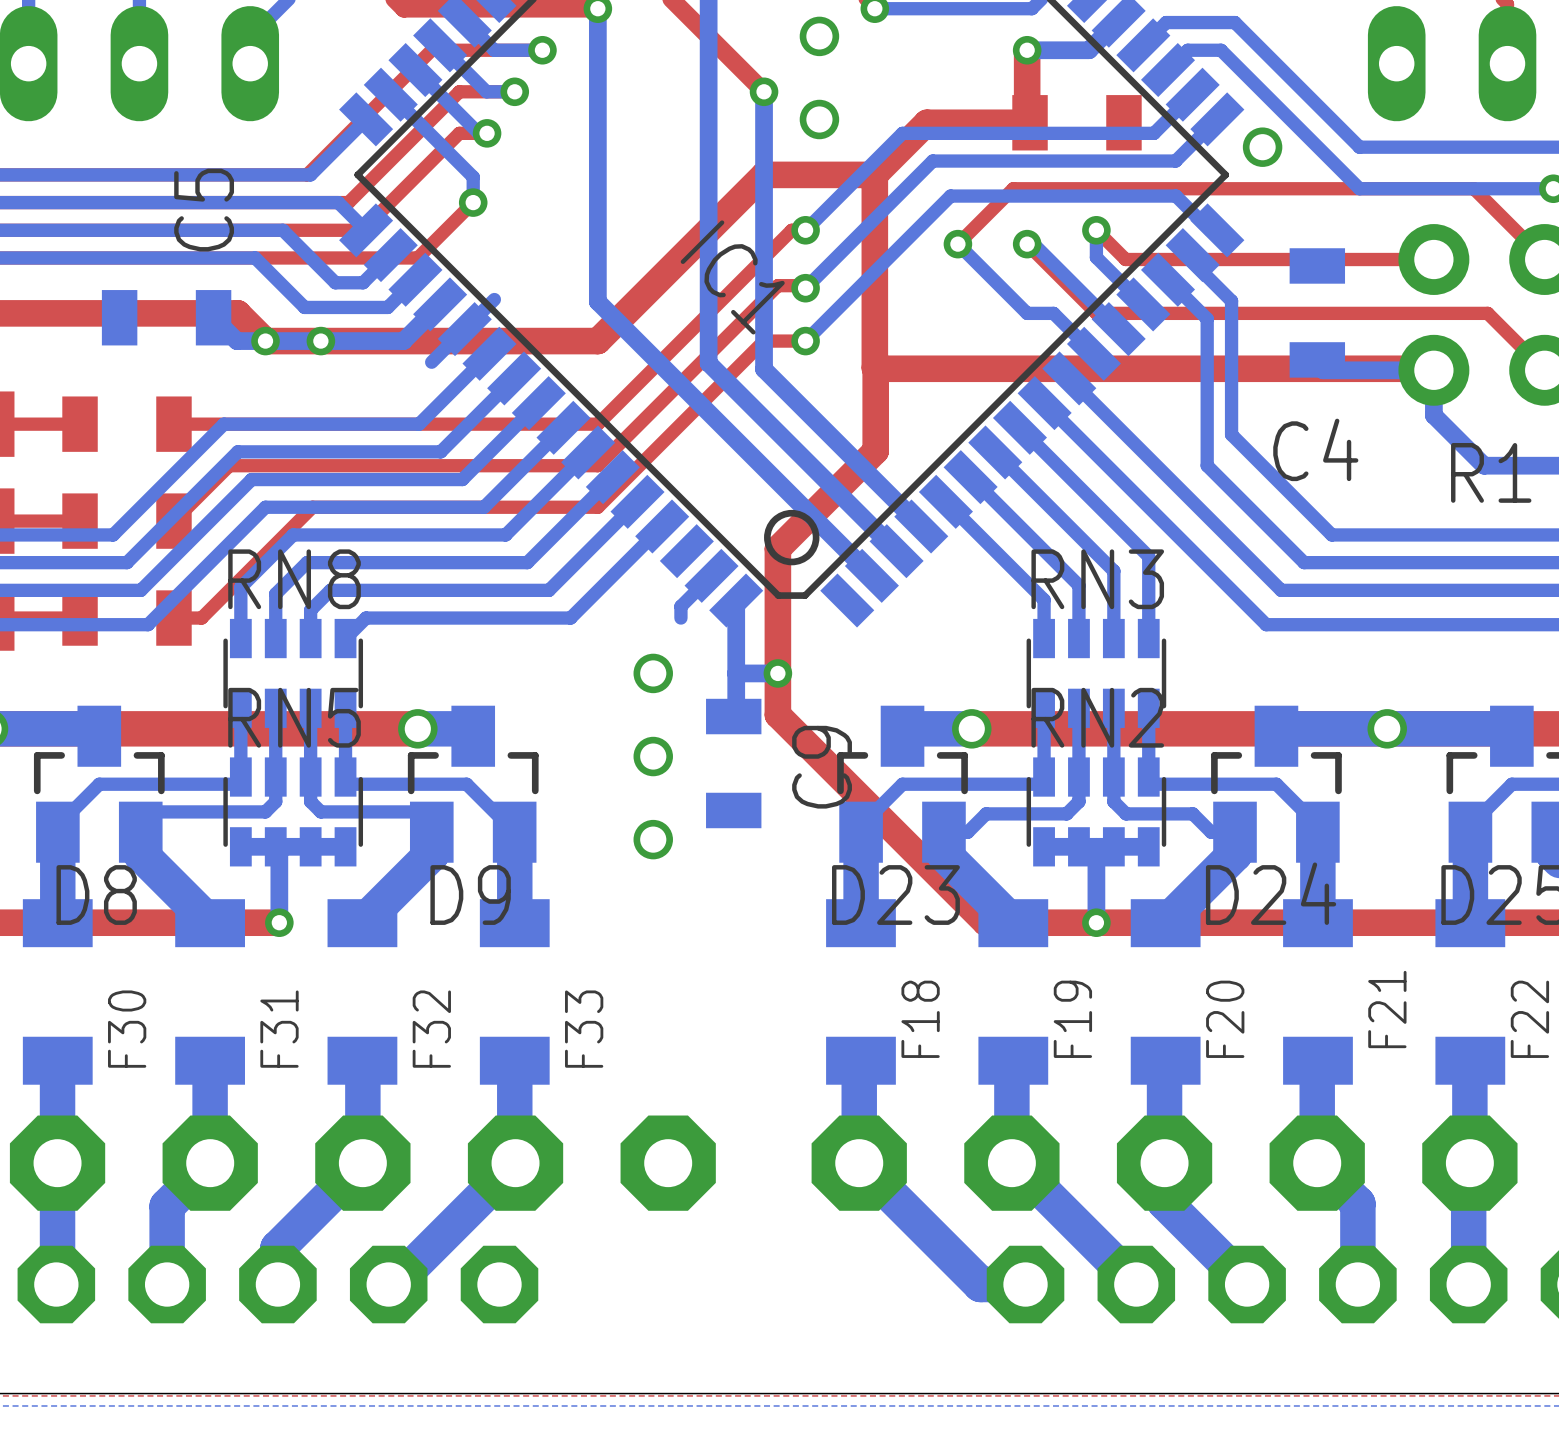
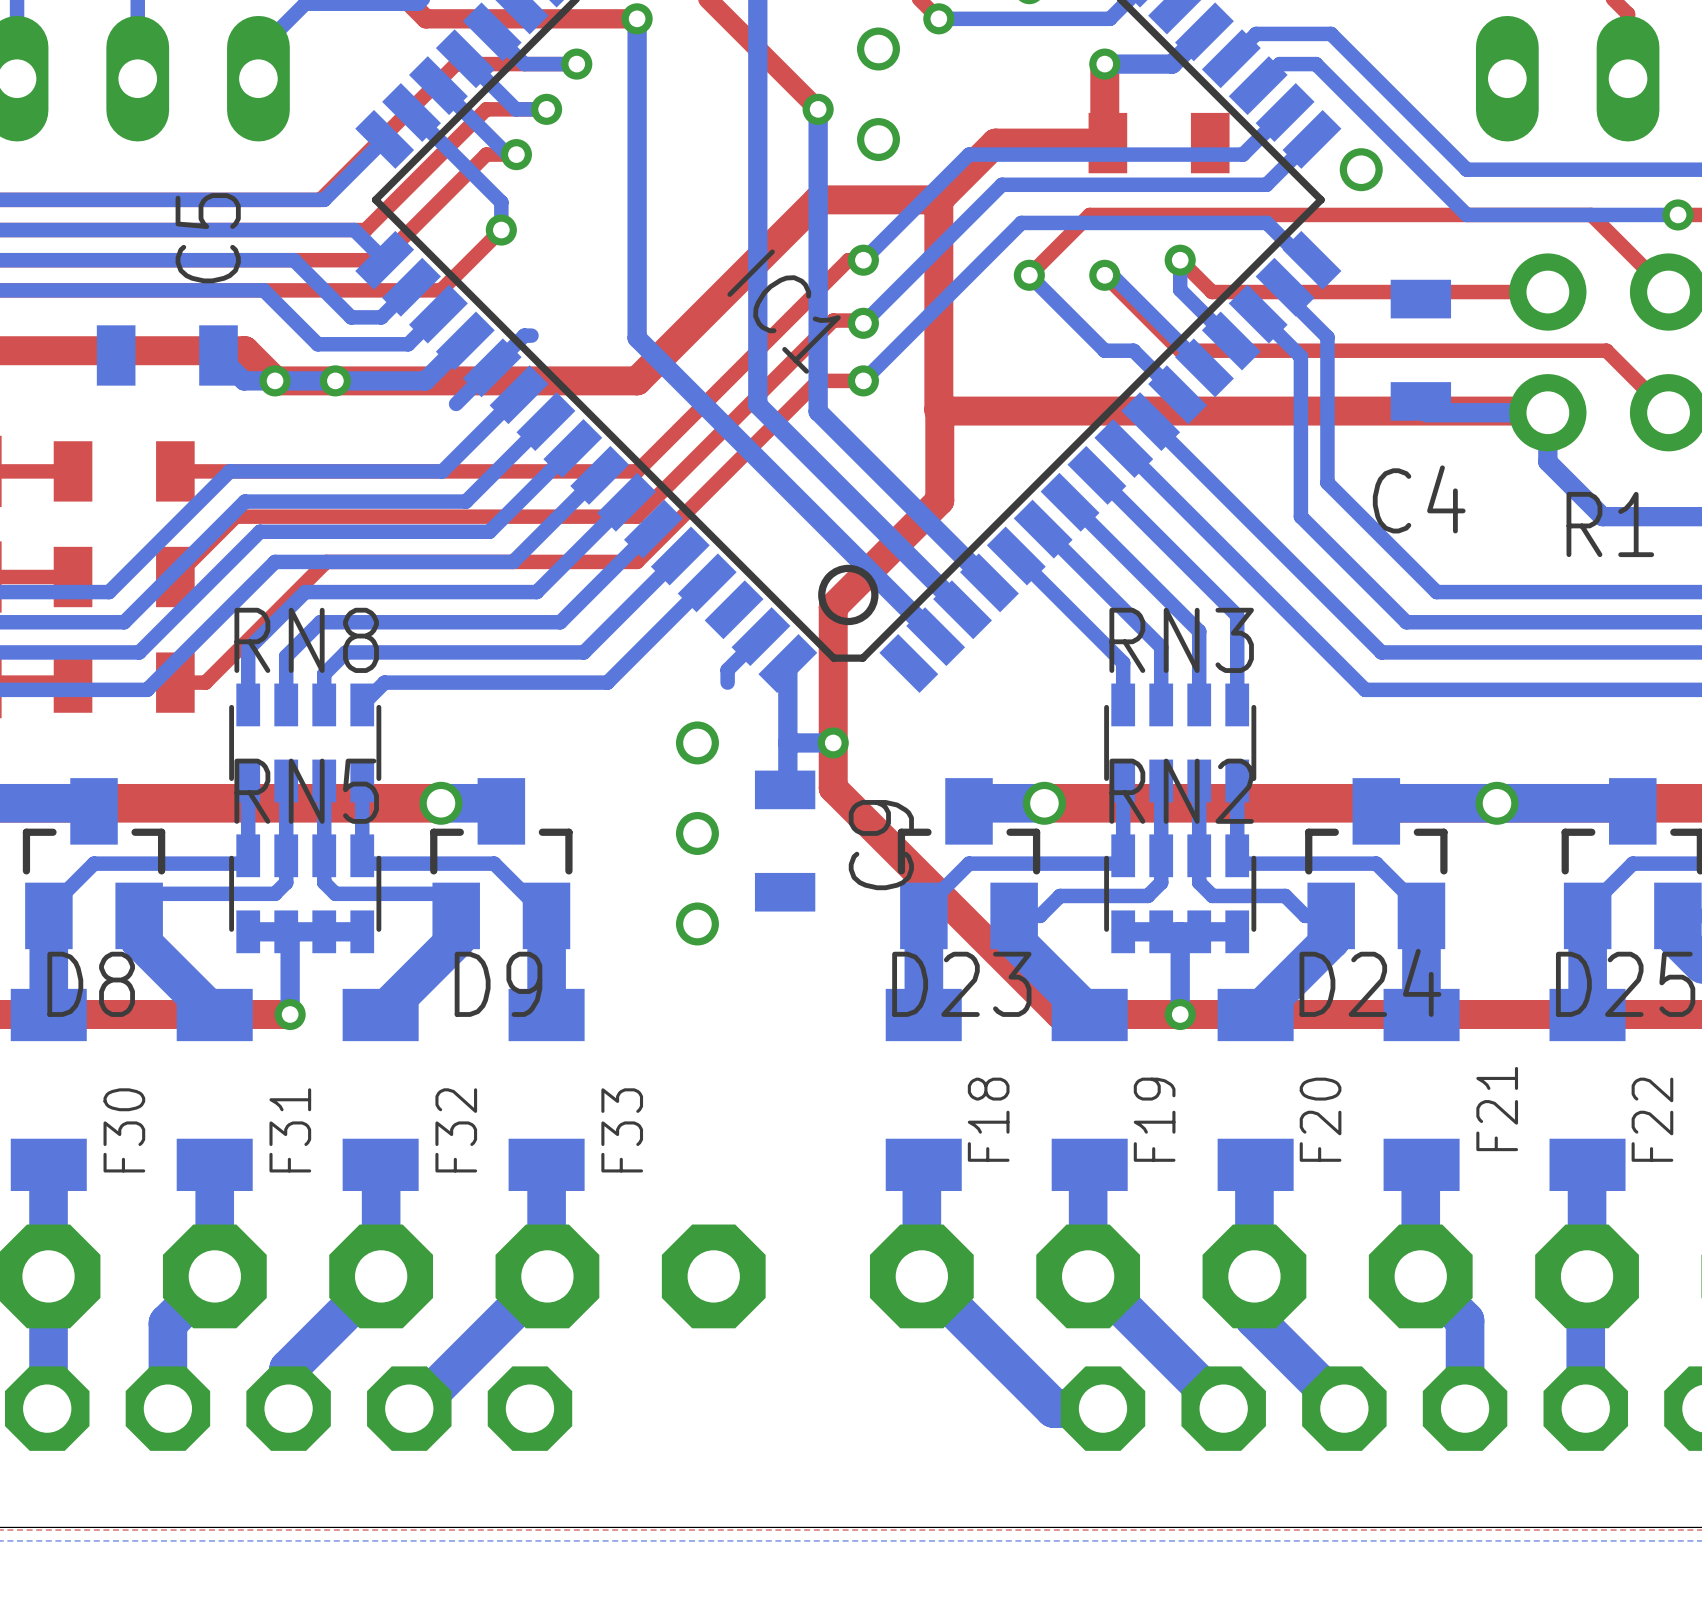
bottom track: none -> (531, 335) (524, 335)

